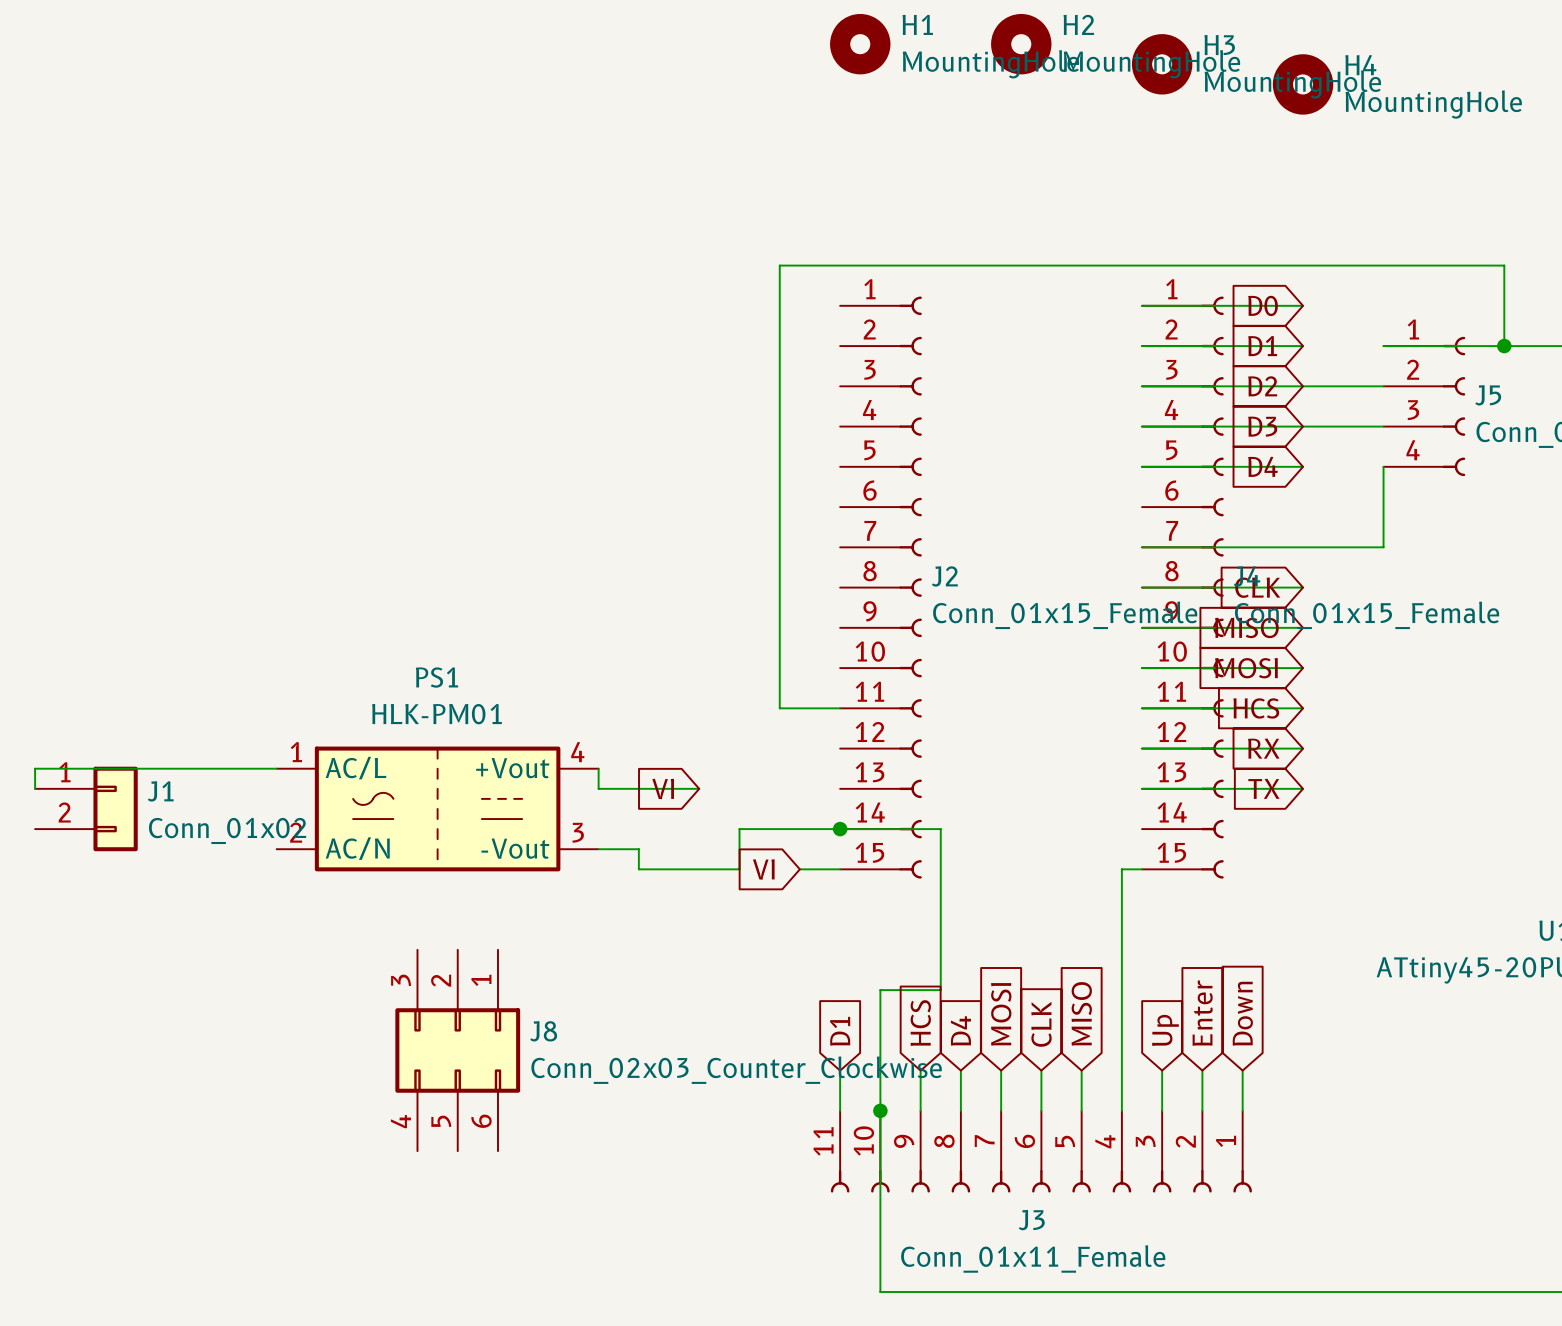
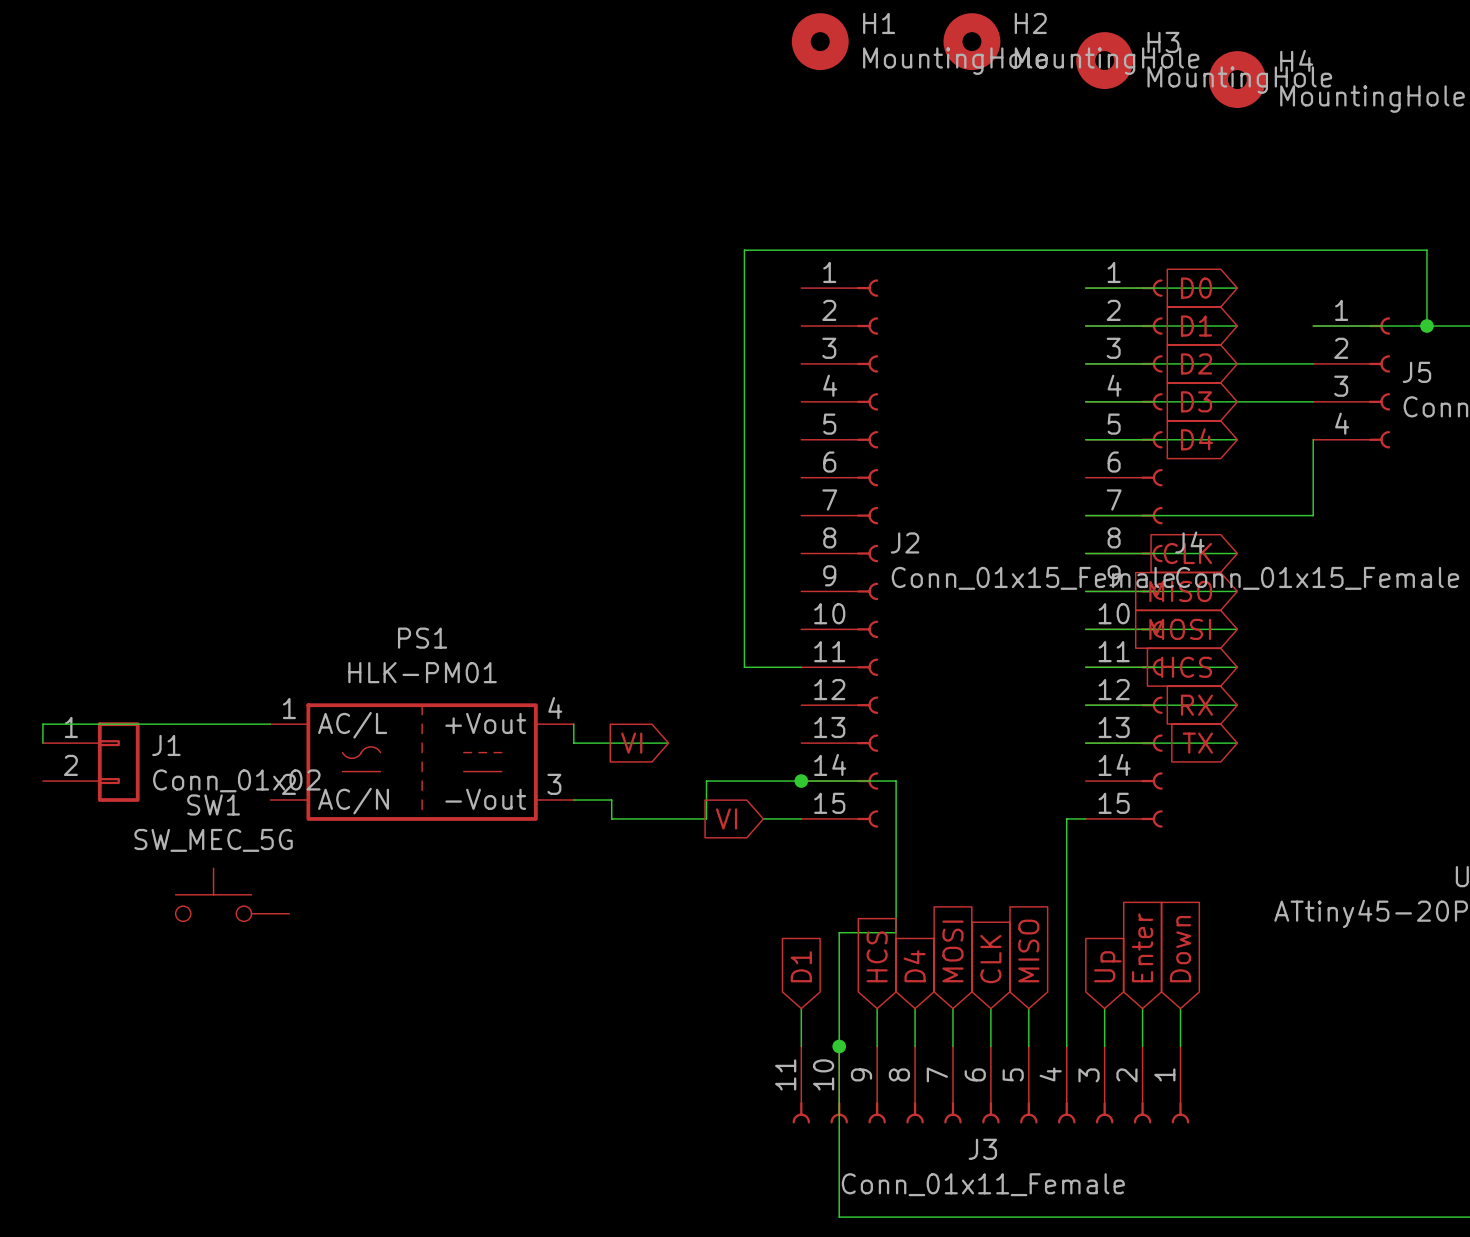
SW1: none -> SW_MEC_5G (232, 894)
J8: Conn_02x03_Counter_Clockwise (457, 1050) -> none

